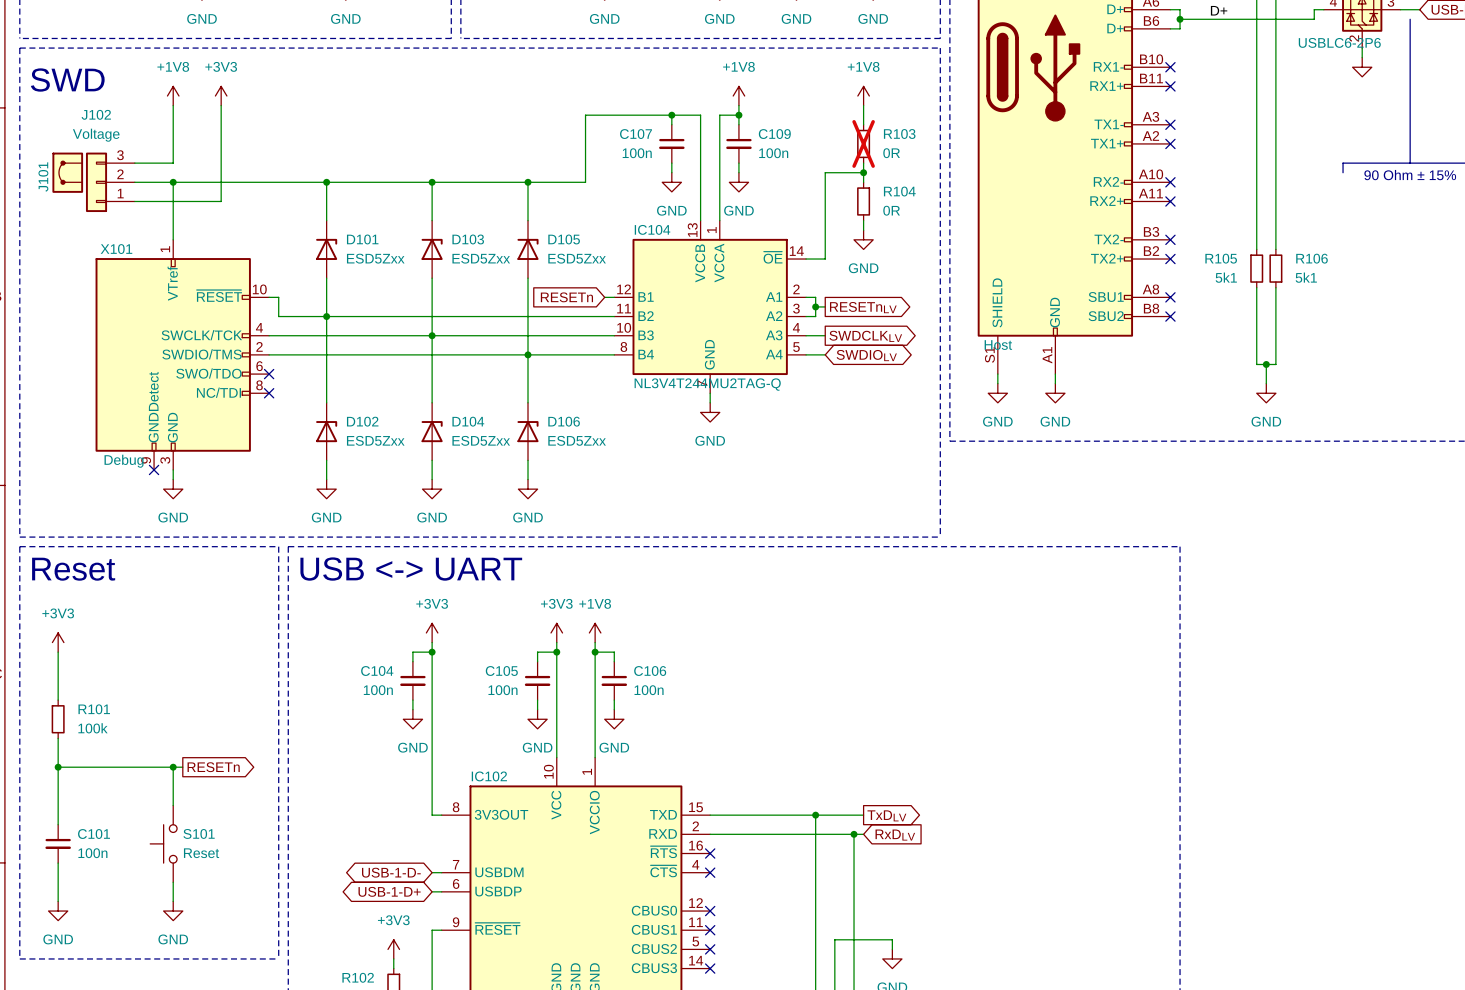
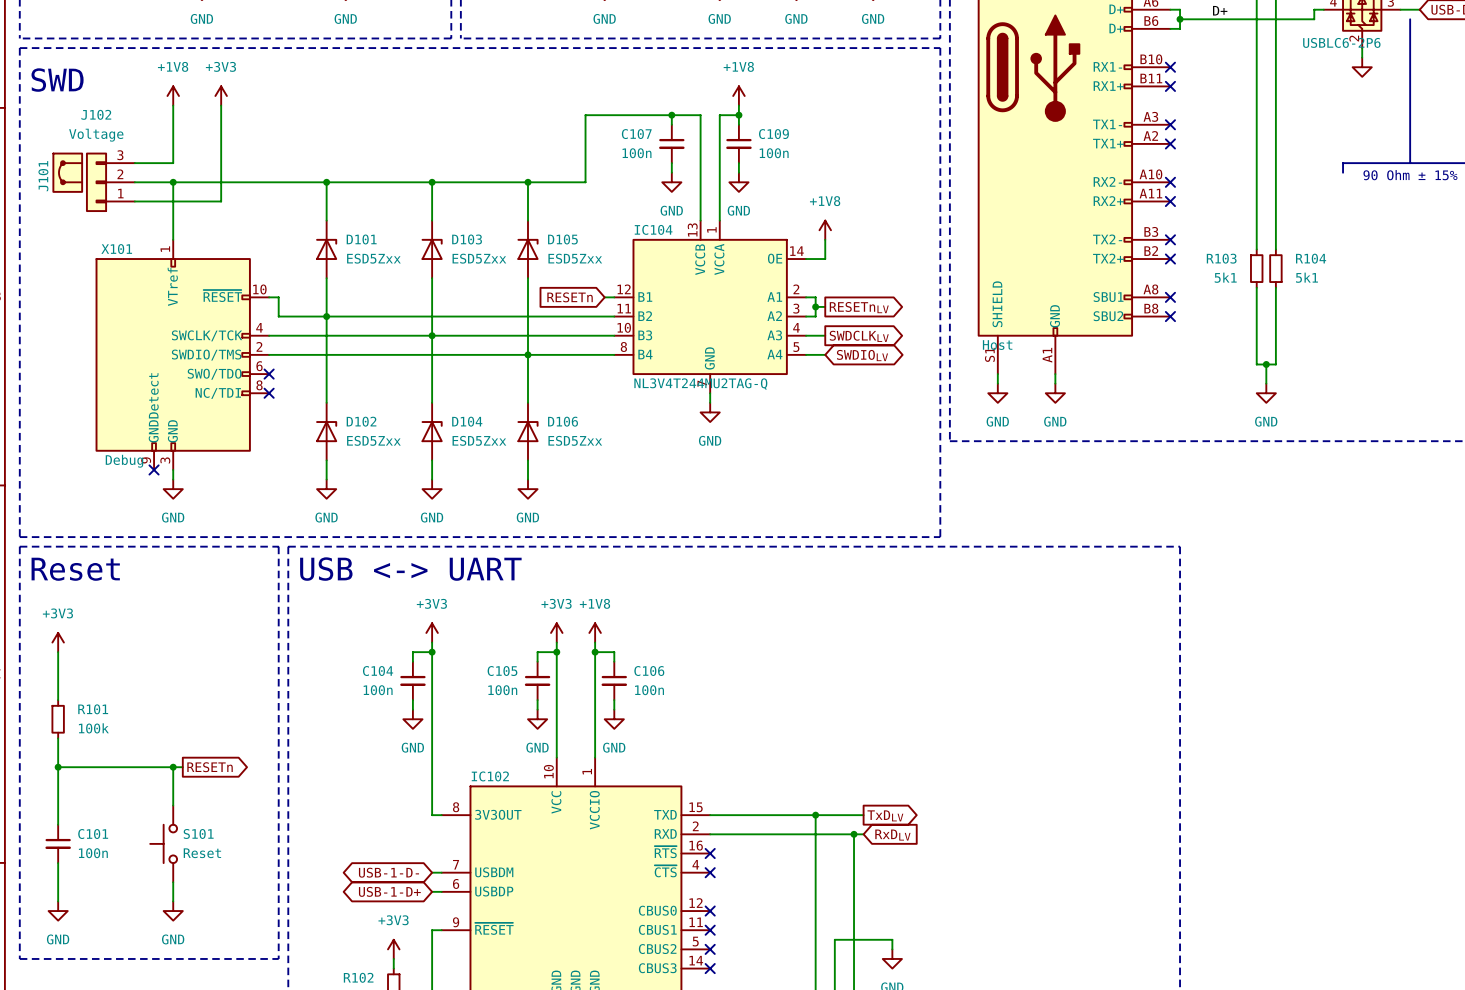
power symbol position: +1V8 (863, 96) -> +1V8 (825, 230)
wire: (863, 105) (863, 124) -> none
R103: 0R (863, 143) -> none
wire: (863, 163) (863, 182) -> none
wire: (863, 172) (825, 172) (825, 239) -> none
junction: (863, 172) -> none
R104: 0R (863, 201) -> none
wire: (863, 220) (863, 230) -> none
power symbol: GND (863, 239) -> none
IC104 pin name: ~{OE} (773, 257) -> OE (775, 258)
R105 name: R105 (1221, 258) -> R103 (1221, 258)
R106 name: R106 (1312, 258) -> R104 (1311, 258)

